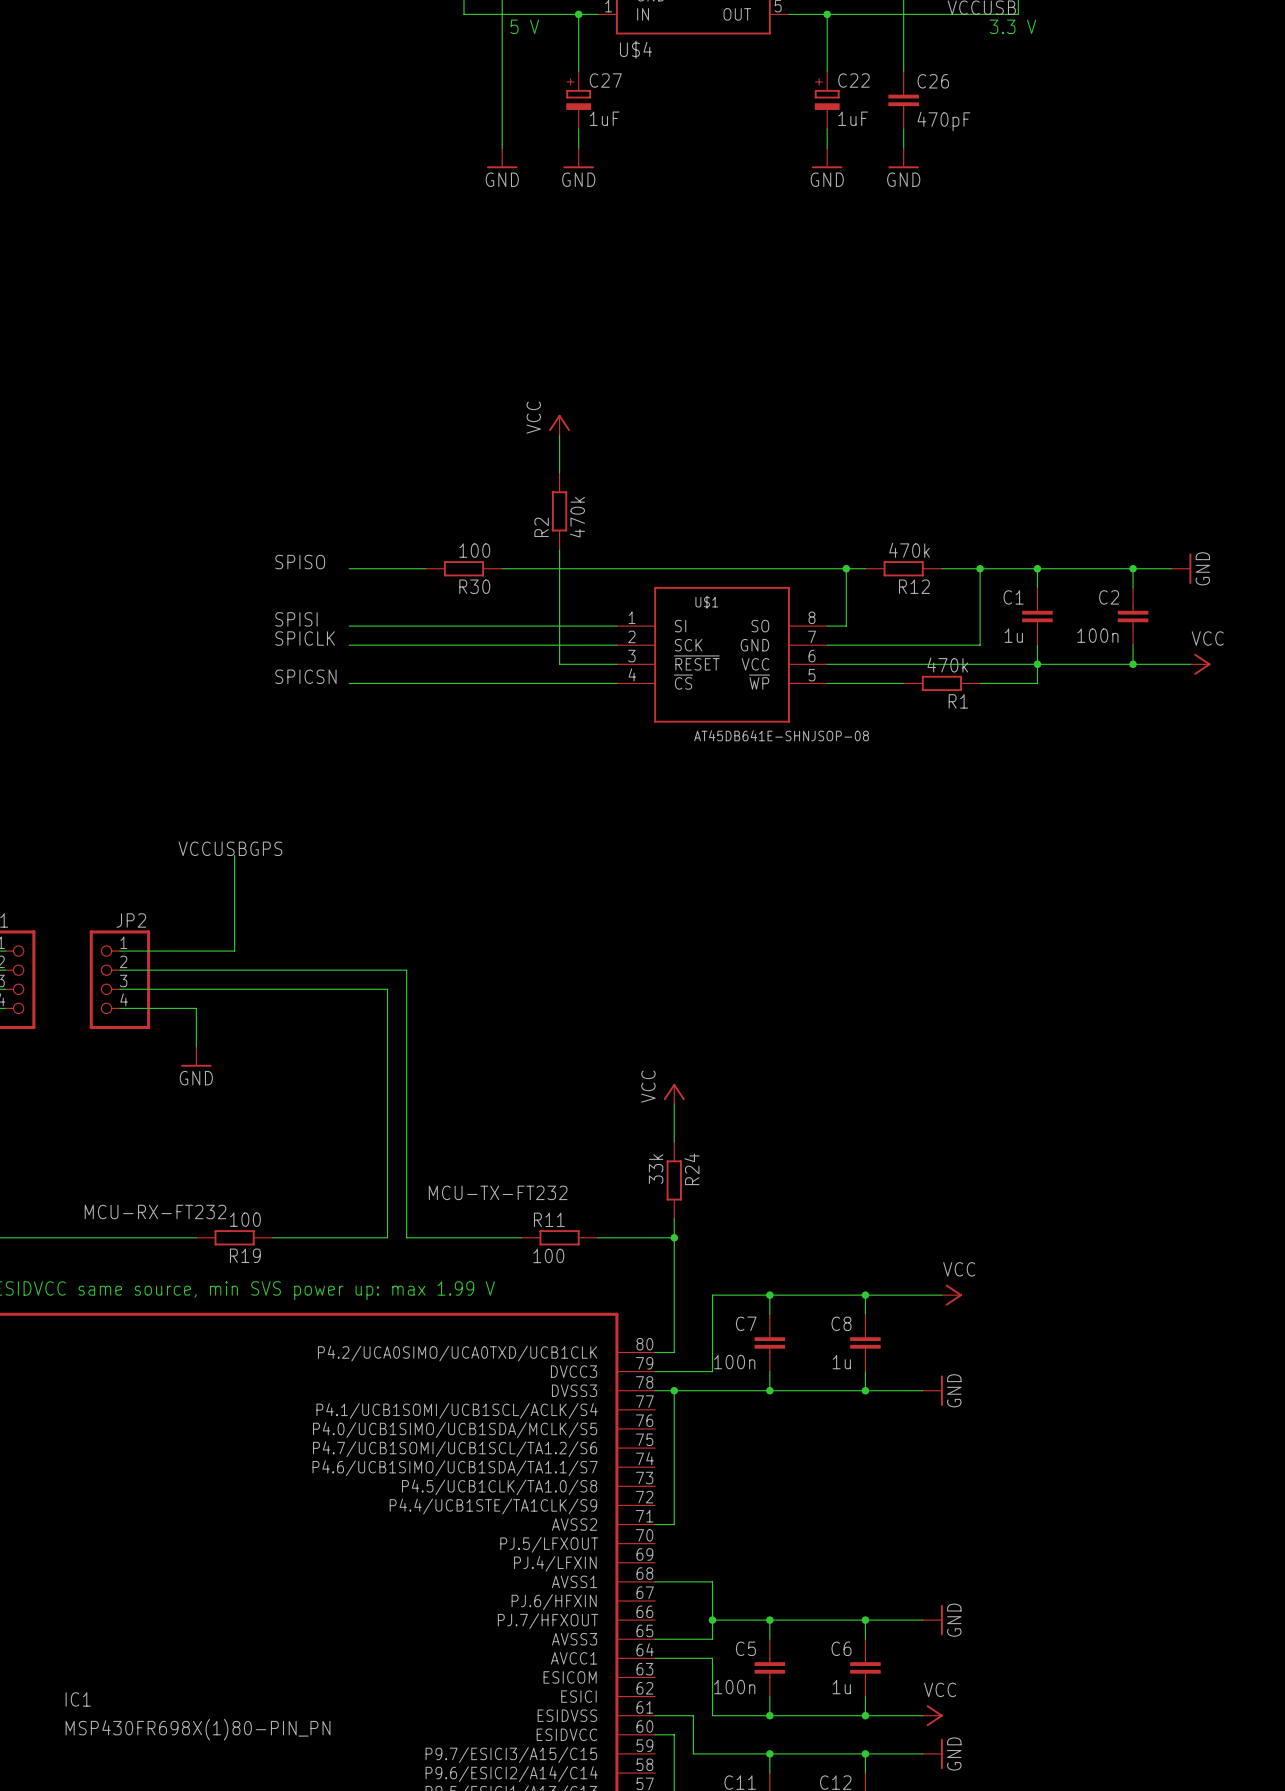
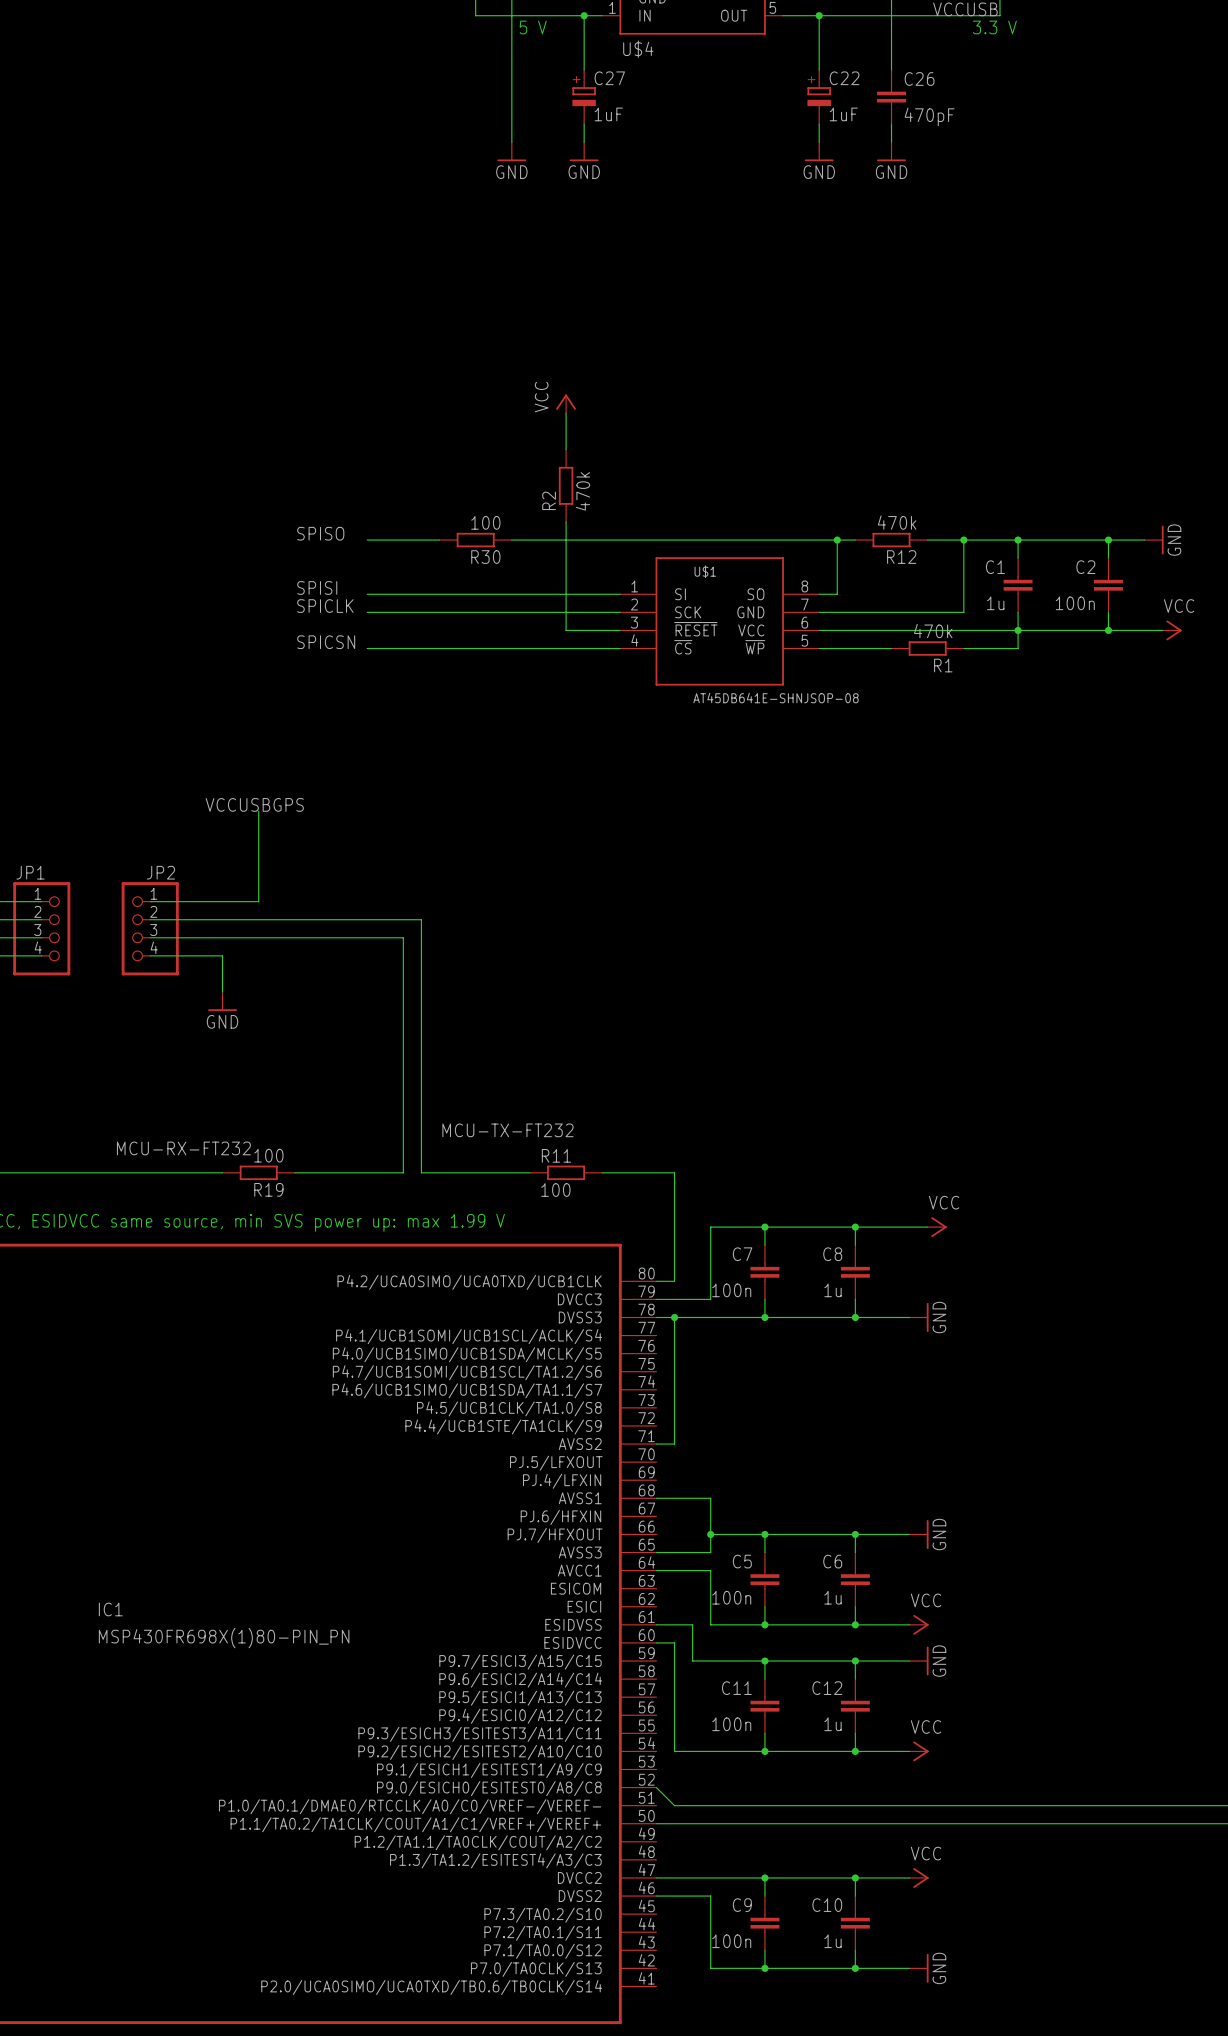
power symbol: VCC (674, 1093) -> none
wire: (674, 1103) (674, 1142) -> none
R24: 33k (674, 1180) -> none
wire: (674, 1218) (674, 1237) -> none
junction: (674, 1237) -> none

